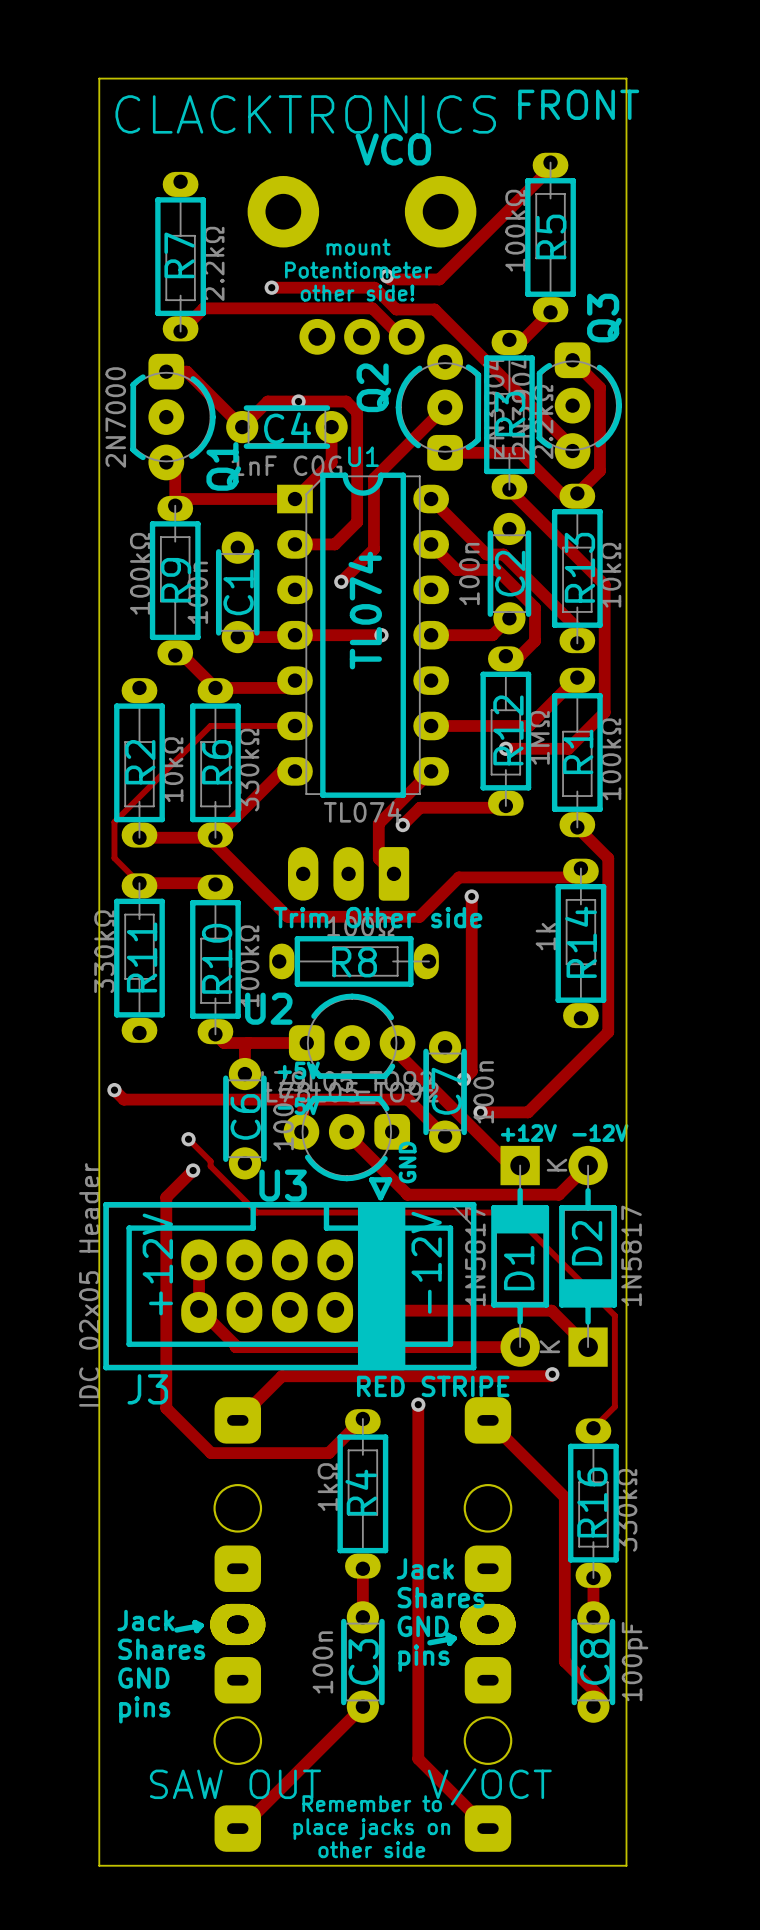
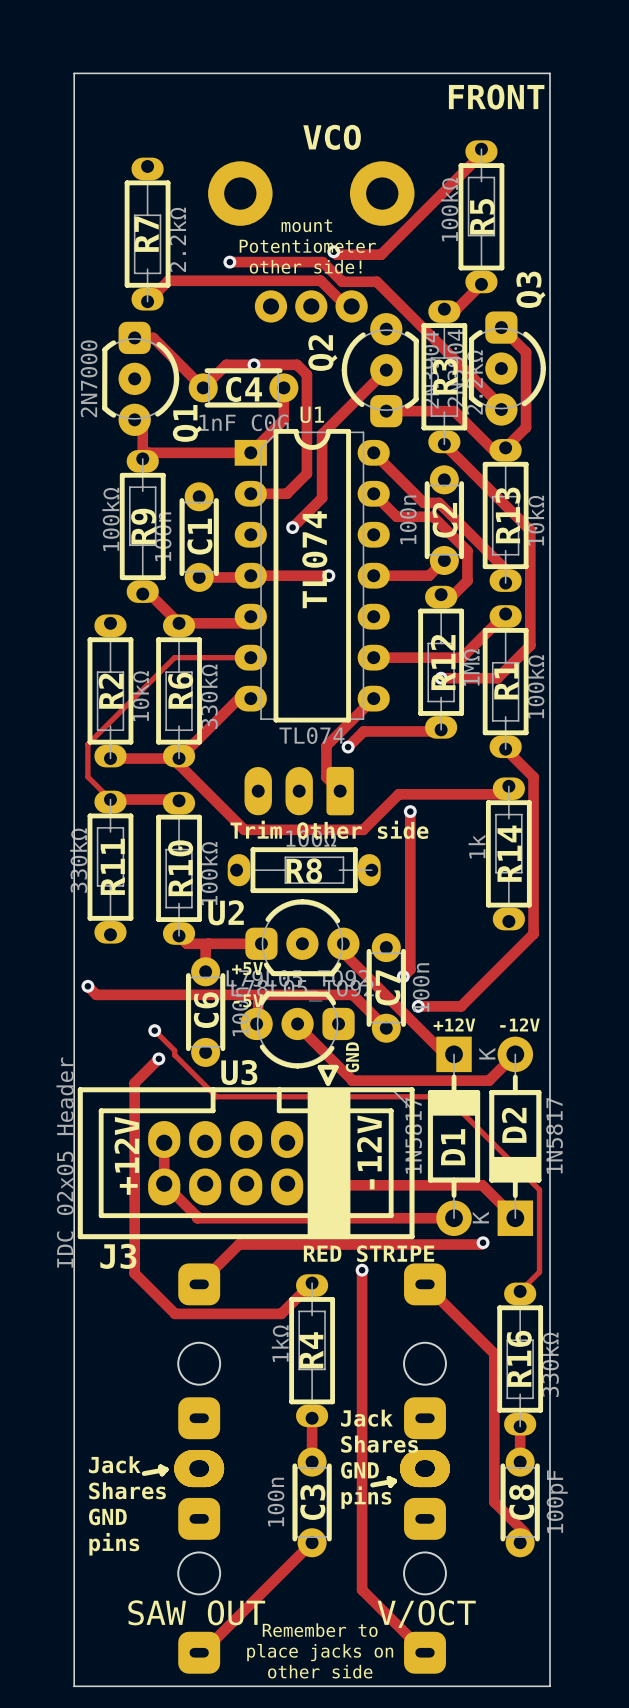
text: CLACKTRONICS (305, 114) -> none

